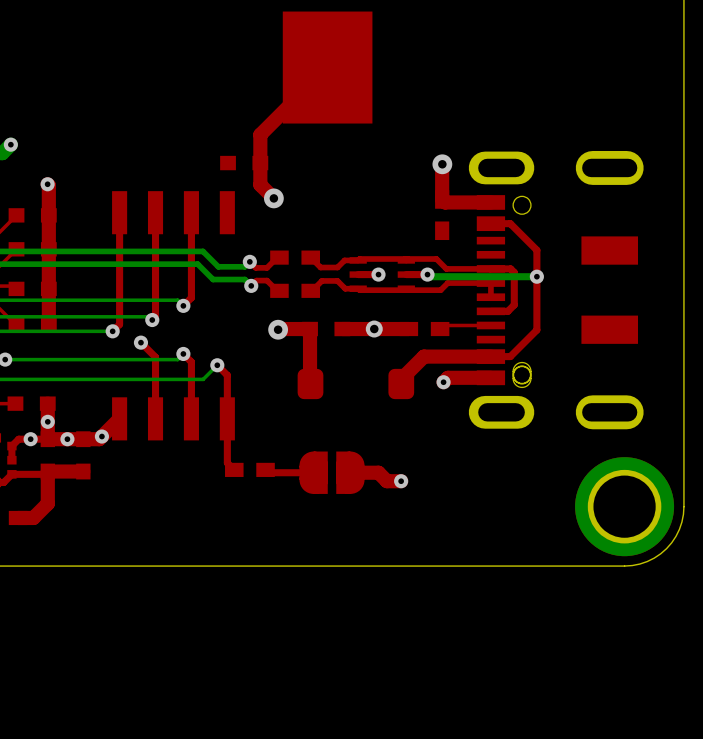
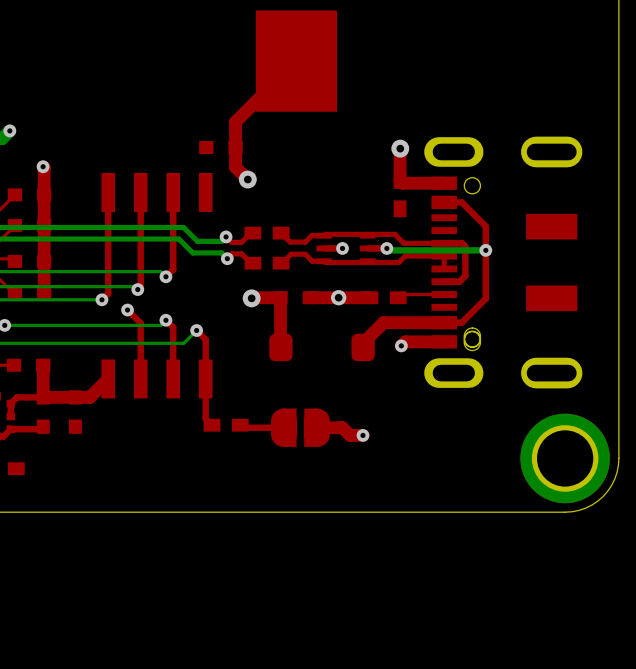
via: (47, 421) -> none
via: (101, 436) -> none
via: (30, 439) -> none
via: (67, 439) -> none
top track: (83, 471) (47, 471) (47, 503) (33, 517) (18, 517) -> none

